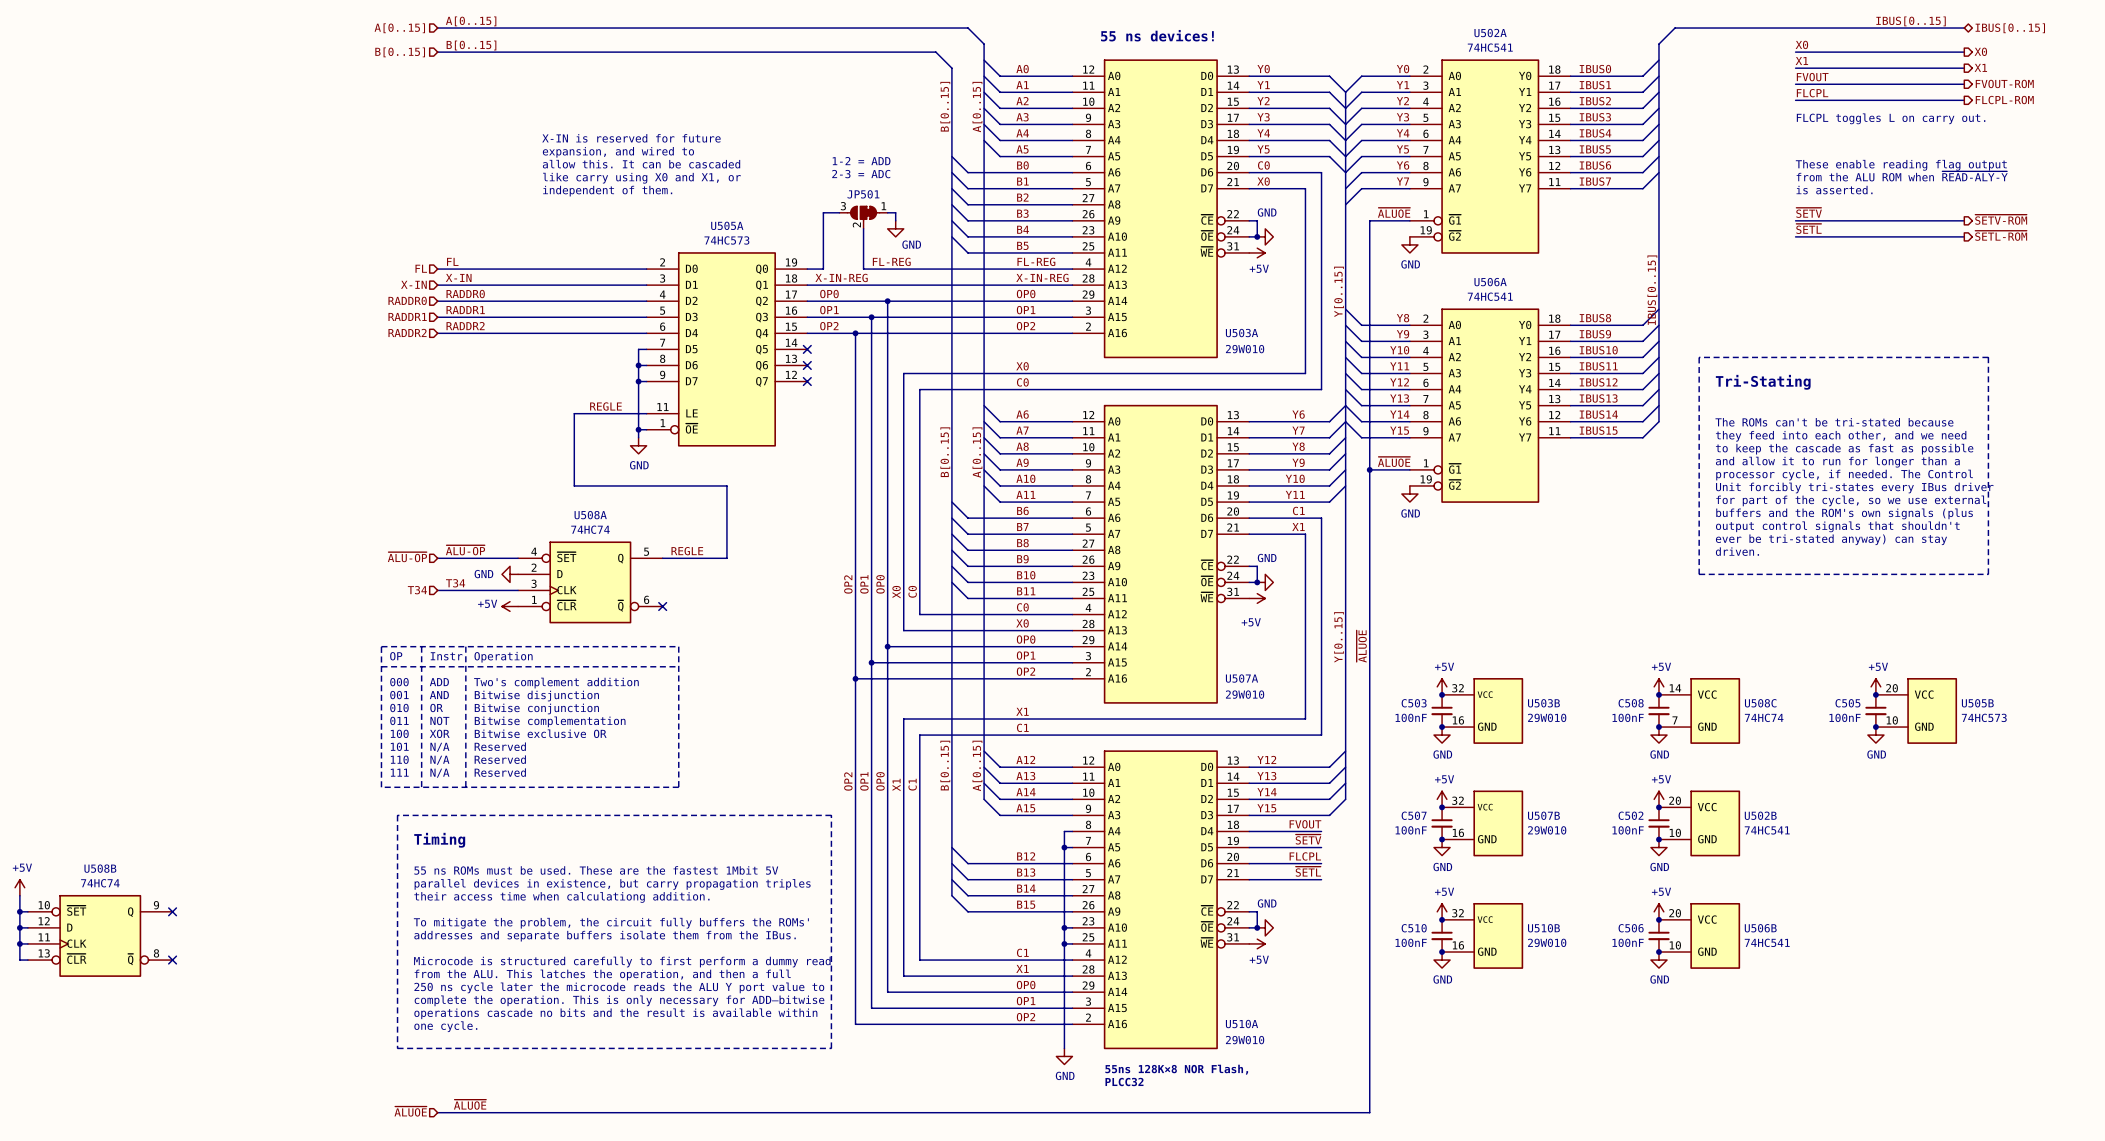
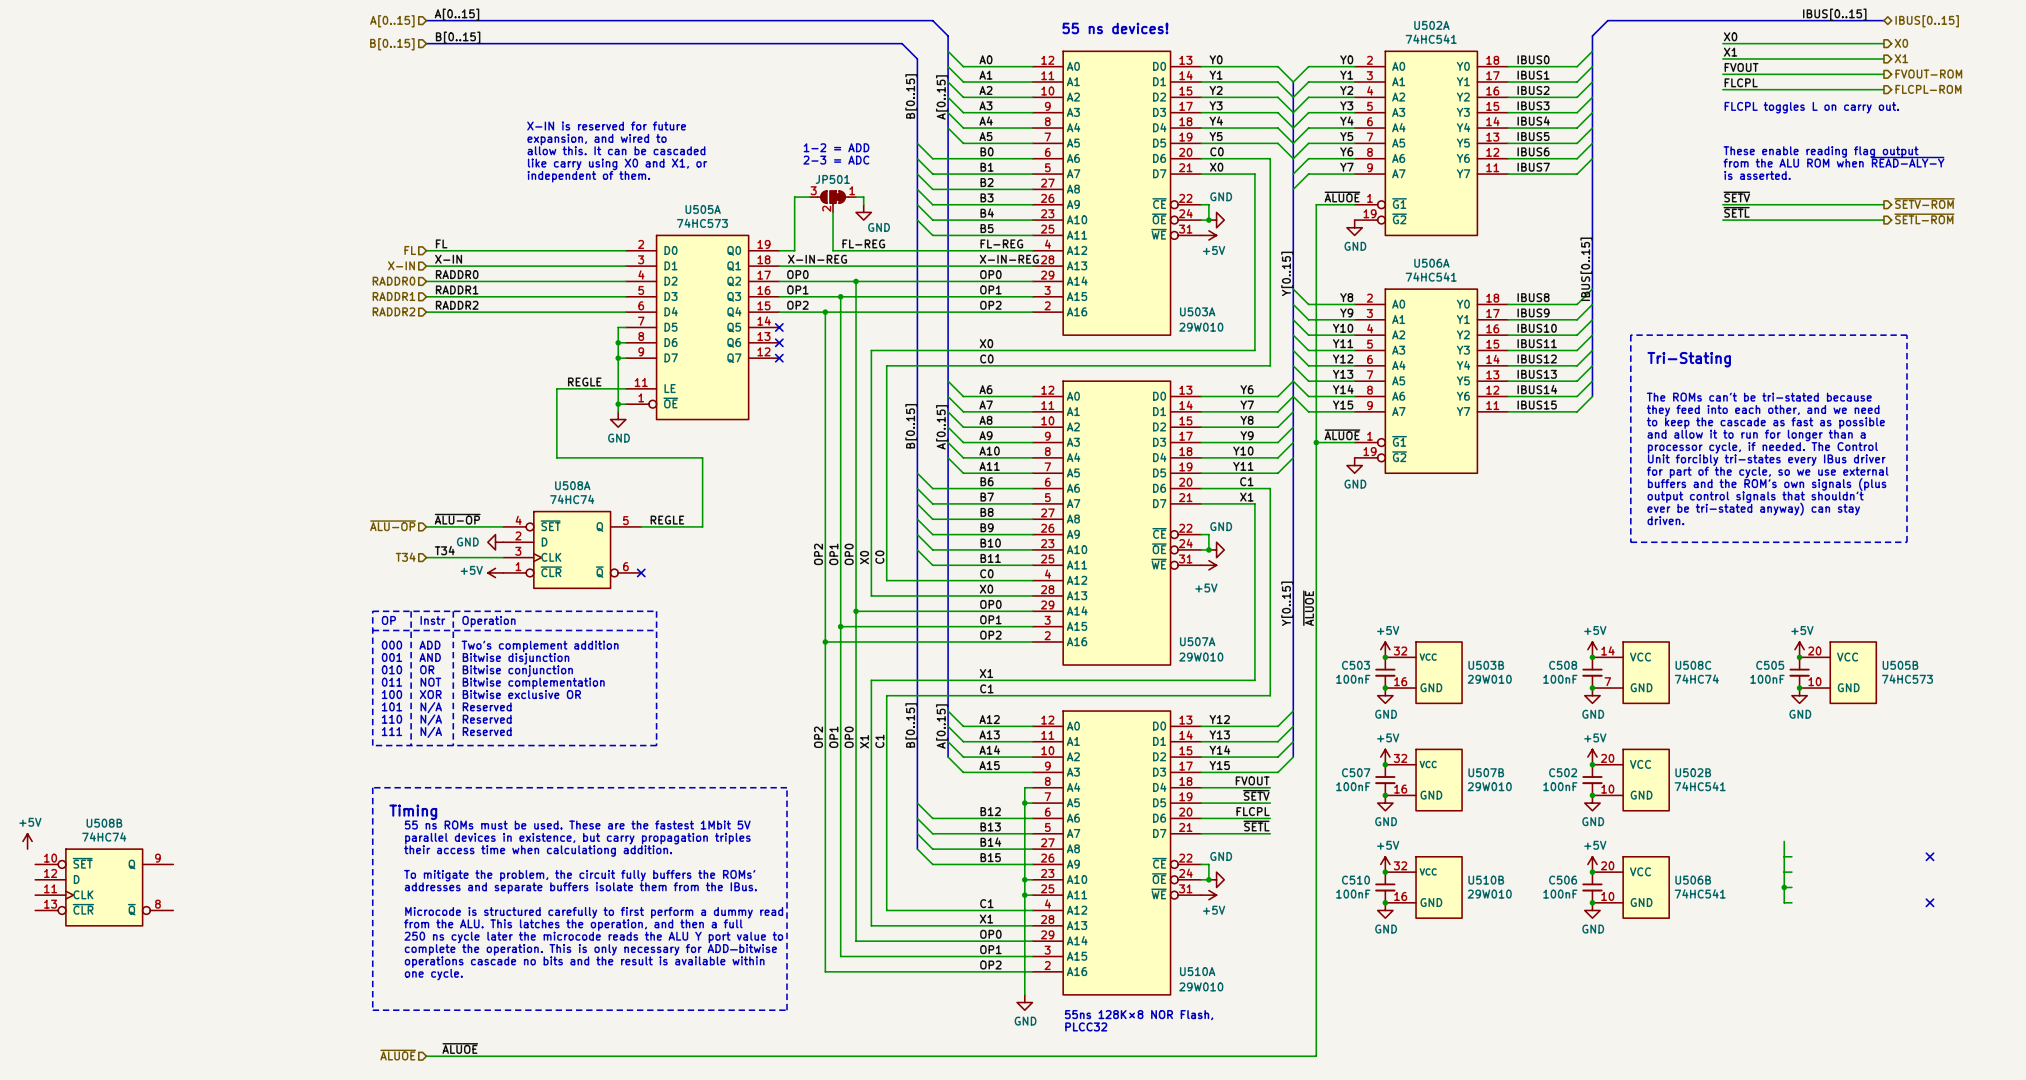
line: (397, 815) (831, 815) (831, 1048) (397, 1048) (397, 815) -> (372, 787) (786, 787) (786, 1010) (372, 1010) (372, 787)
text position: Timing (439, 840) -> Timing (413, 812)
wire: none -> (1784, 841) (1784, 902) (1791, 902)
wire: (19, 895) (19, 960) (27, 960) -> none
wire: none -> (1784, 856) (1791, 856)
no-connect mark: none -> (1929, 856)
wire: (19, 911) (27, 911) -> none
junction: (19, 911) -> none
no-connect mark: (172, 911) -> none
wire: none -> (1784, 872) (1791, 872)
wire: (19, 927) (27, 927) -> none
junction: (19, 927) -> none
wire: none -> (1784, 887) (1791, 887)
junction: none -> (1784, 887)
wire: (19, 943) (27, 943) -> none
junction: (19, 943) -> none
no-connect mark: none -> (1929, 902)
no-connect mark: (172, 960) -> none

